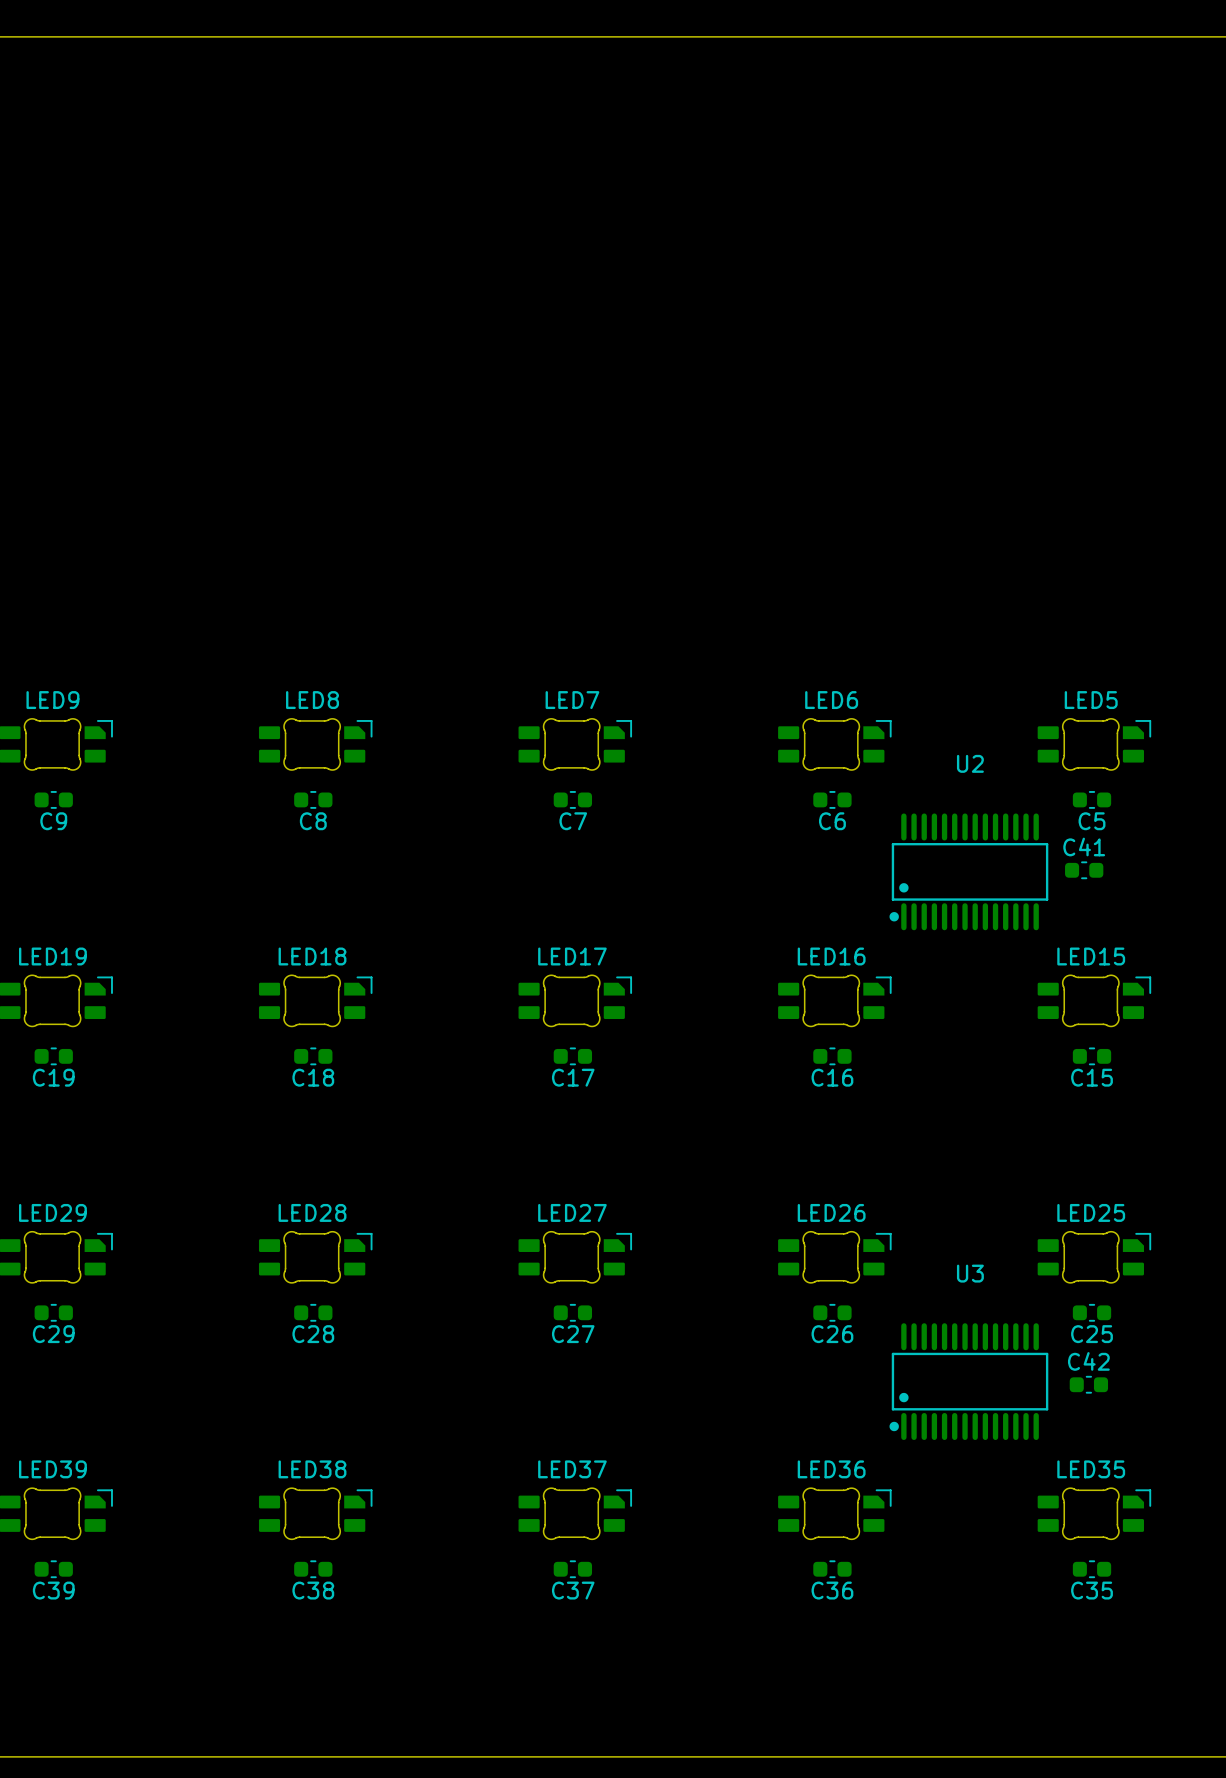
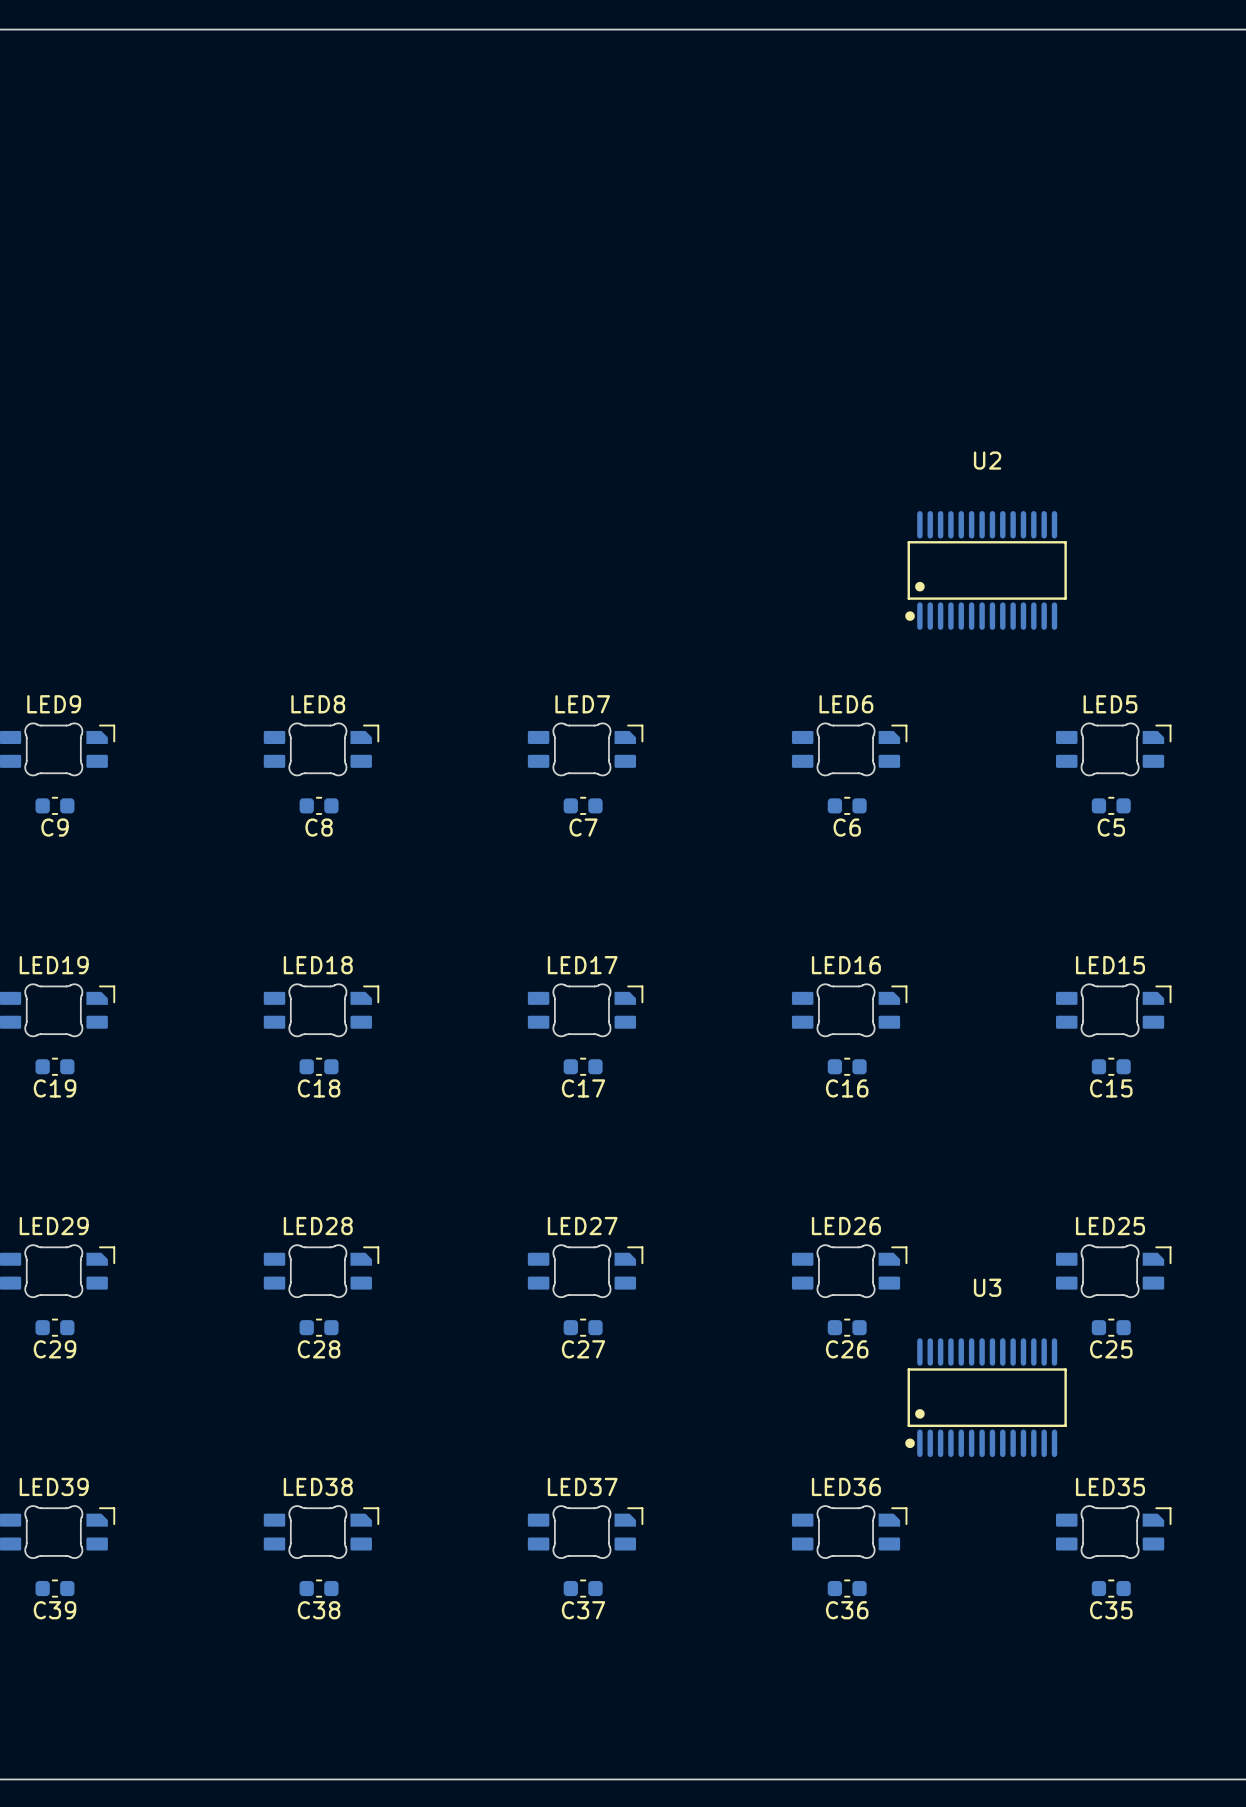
C41: (1084, 870) -> none
U2 position: (968, 871) -> (986, 570)
C42: (1088, 1384) -> none

